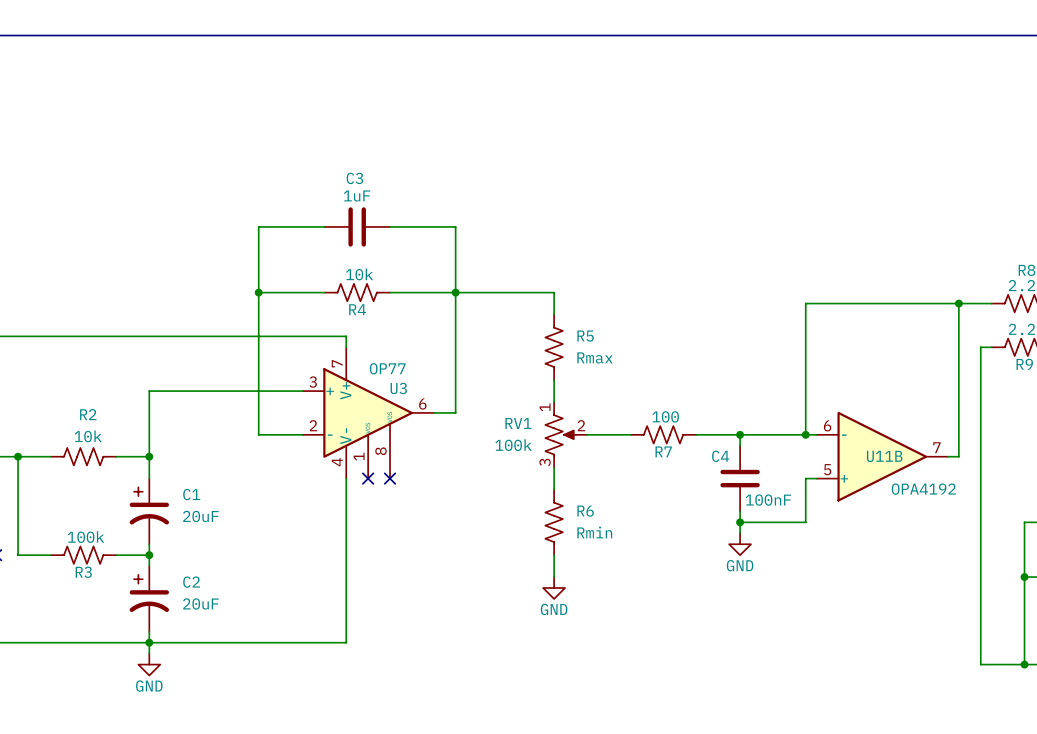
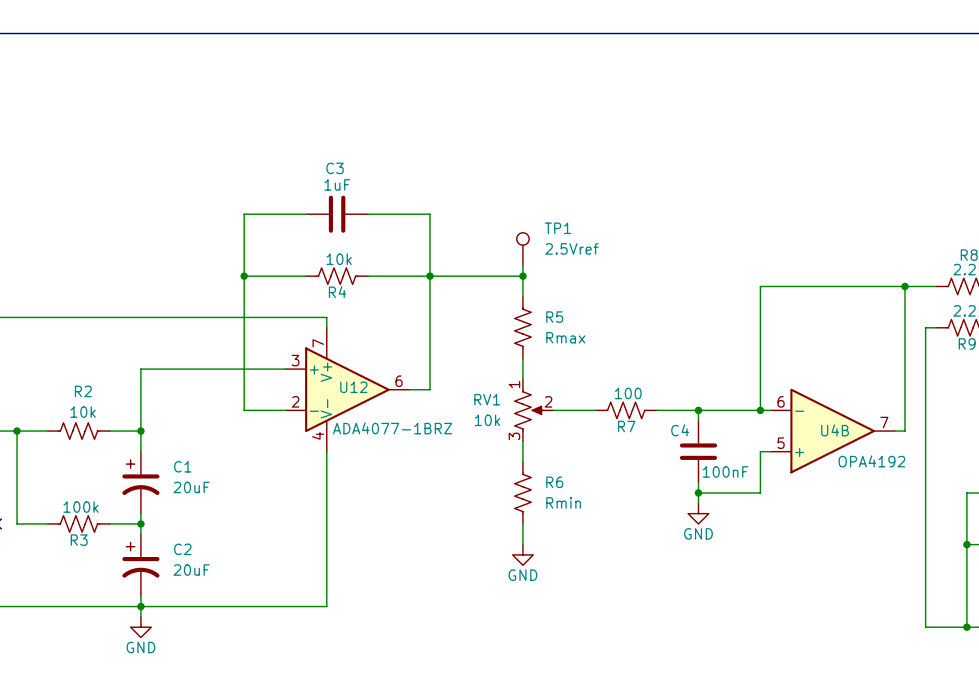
TP1: none -> 2.5Vref (522, 249)
wire: none -> (522, 265) (522, 276)
junction: none -> (522, 276)
U3: OP77 (368, 412) -> none
U12: none -> ADA4077-1BRZ (347, 389)
RV1 value: 100k (513, 445) -> 10k (487, 420)
U11B name: U11B (884, 456) -> U4B (835, 430)
no-connect mark: (368, 478) -> none
no-connect mark: (390, 478) -> none

